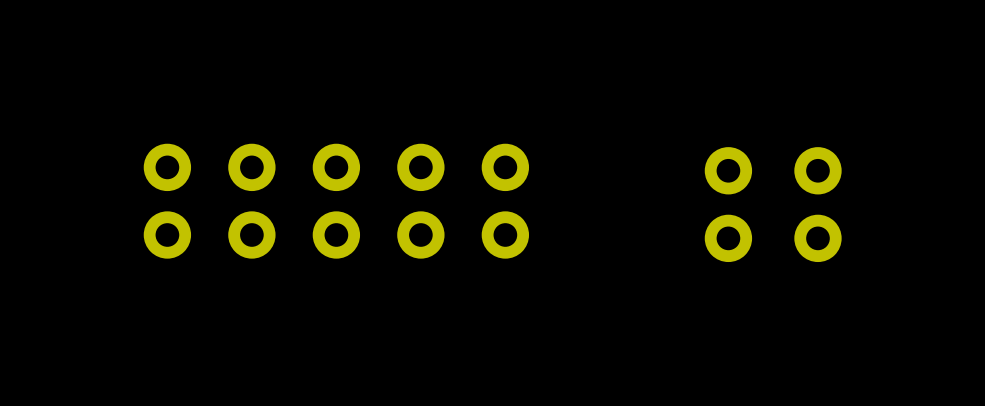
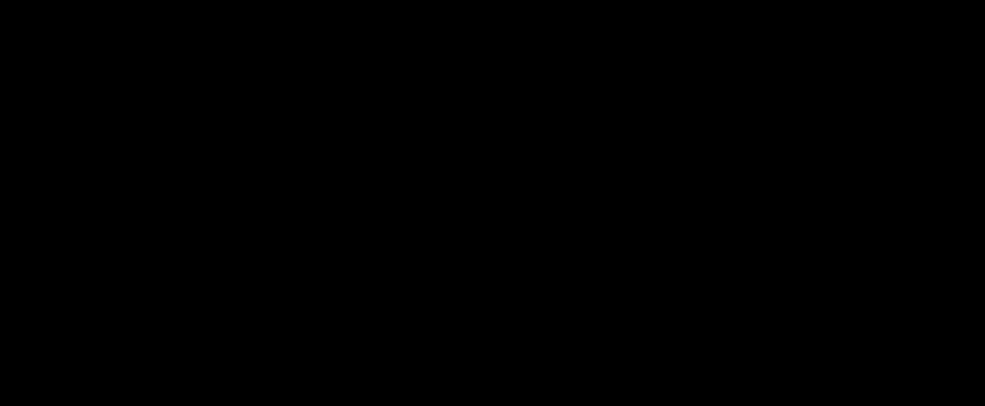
part: (167, 201) -> none
part: (251, 201) -> none
part: (336, 201) -> none
part: (420, 201) -> none
part: (505, 201) -> none
part: (728, 204) -> none
part: (817, 204) -> none

